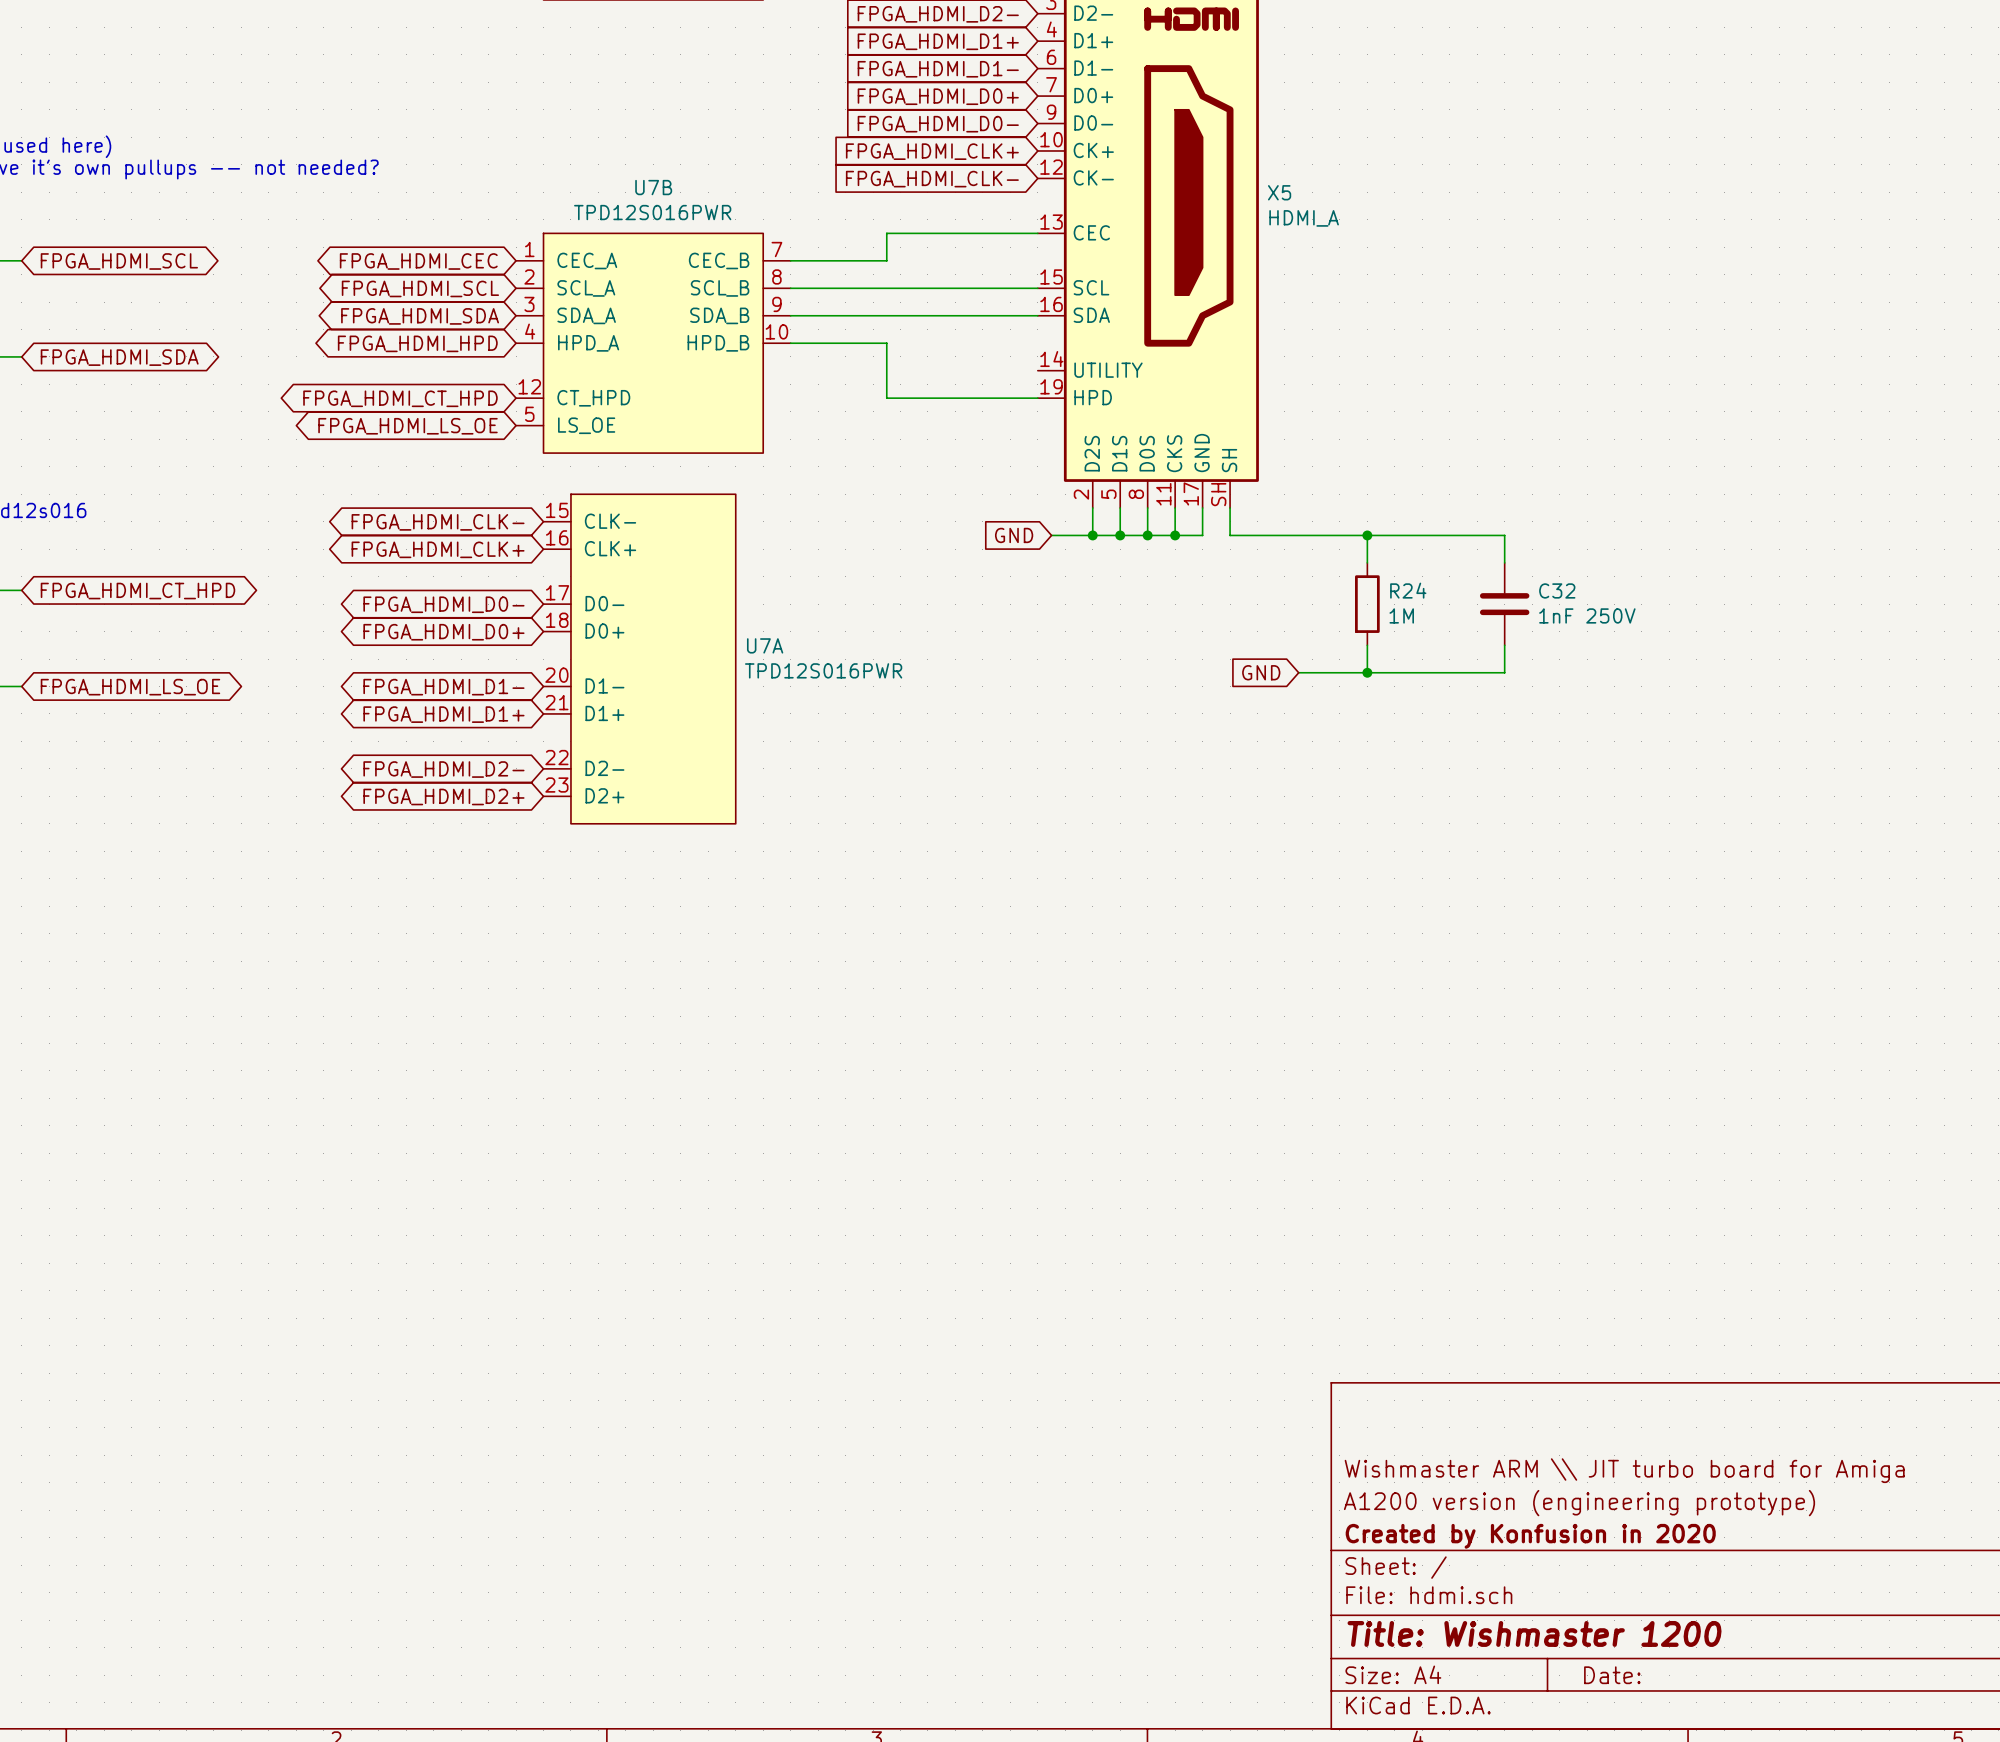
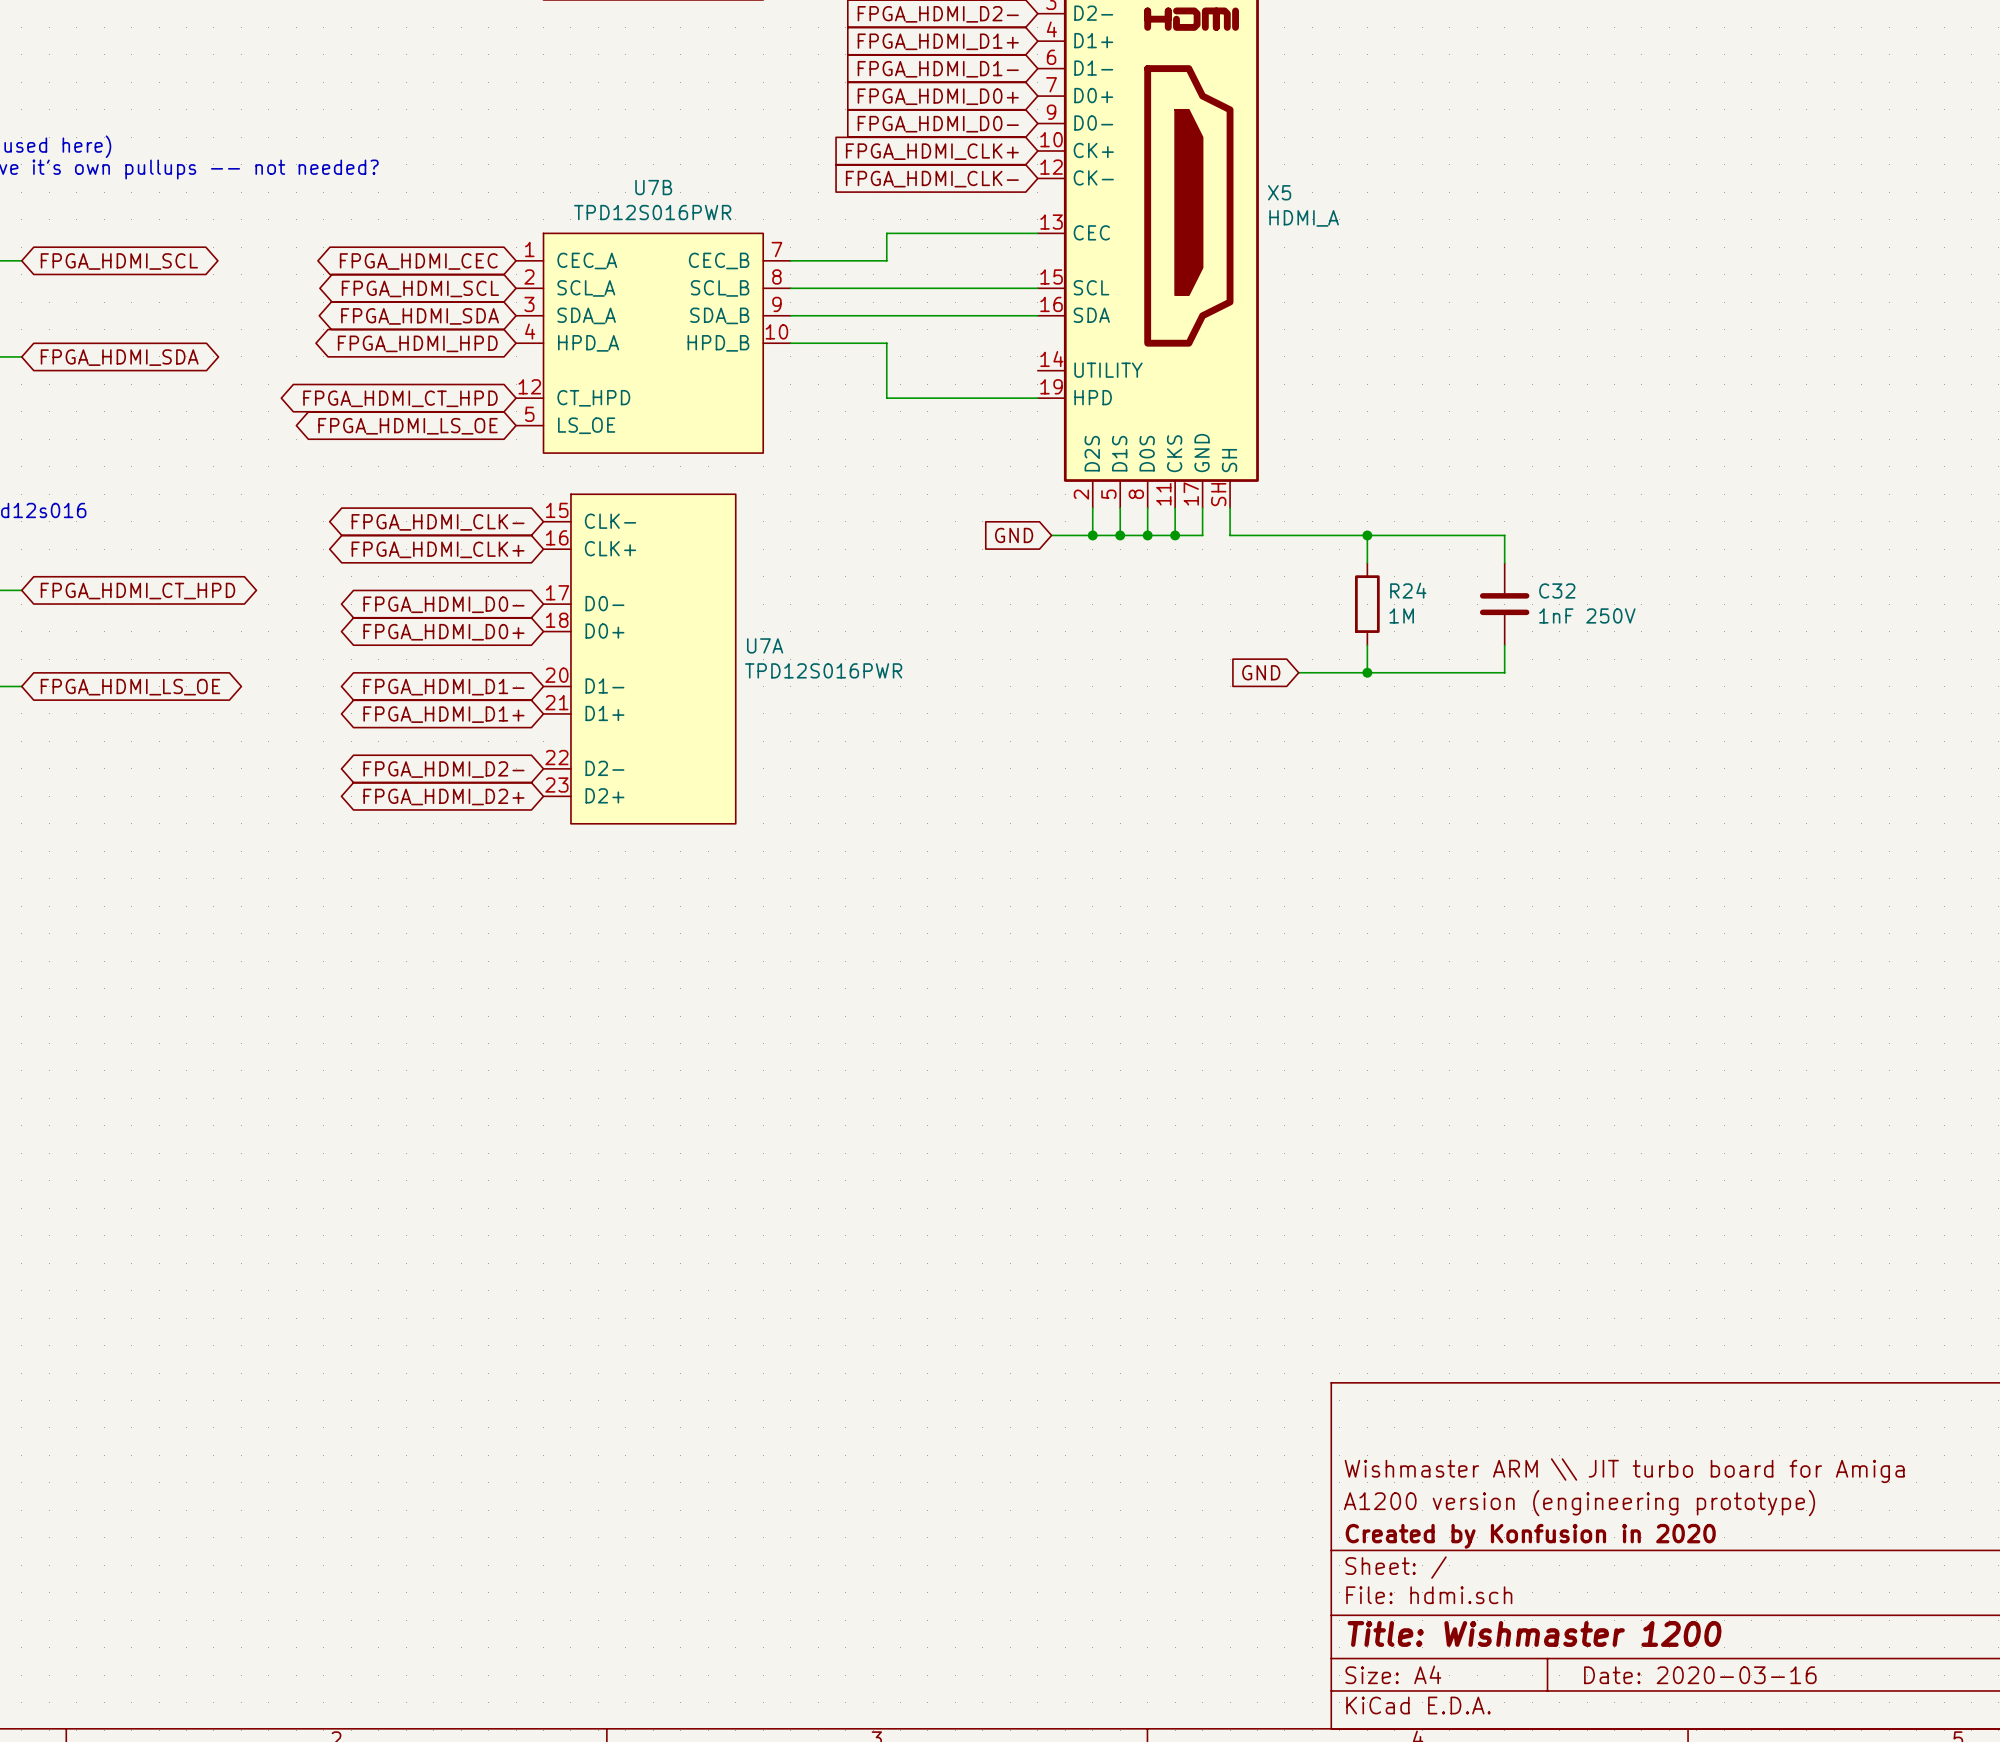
title block: Date: (1612, 1675) -> Date: 2020-03-16 (1700, 1675)

